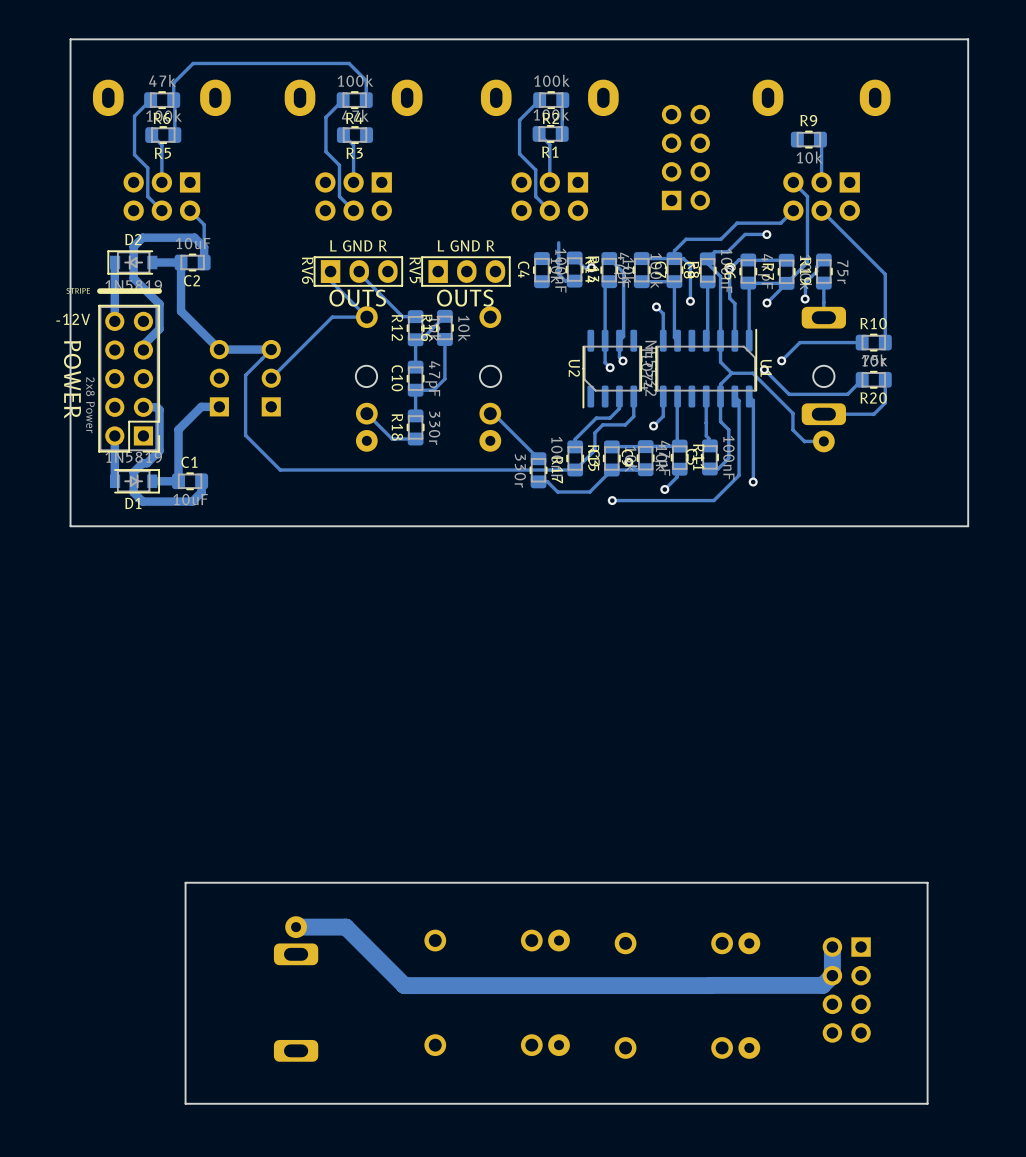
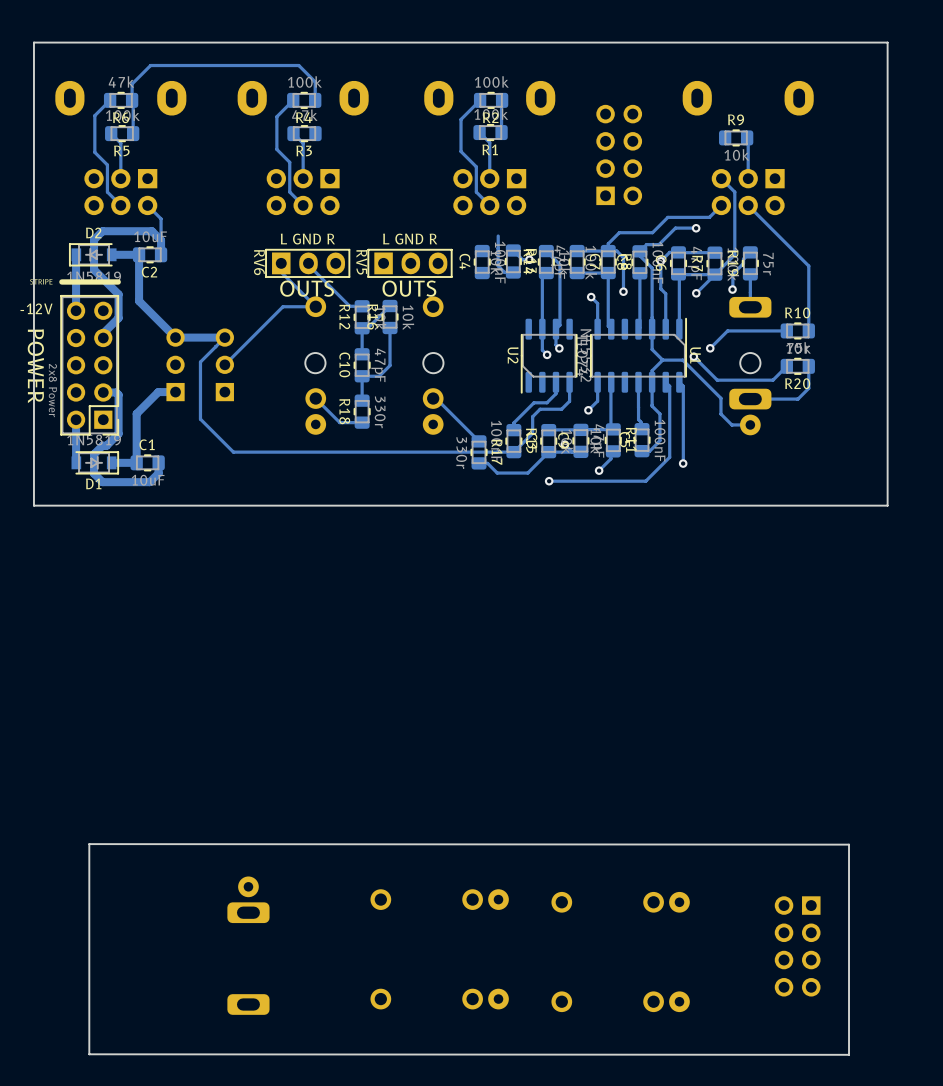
board edge: (927, 882) (185, 882) (185, 1103) (927, 1103) -> (849, 844) (89, 844) (89, 1054) (849, 1054)
track: (296, 927) (345, 927) (404, 985) (822, 985) (832, 975) (832, 947) -> none
part position: (846, 990) -> (797, 946)

